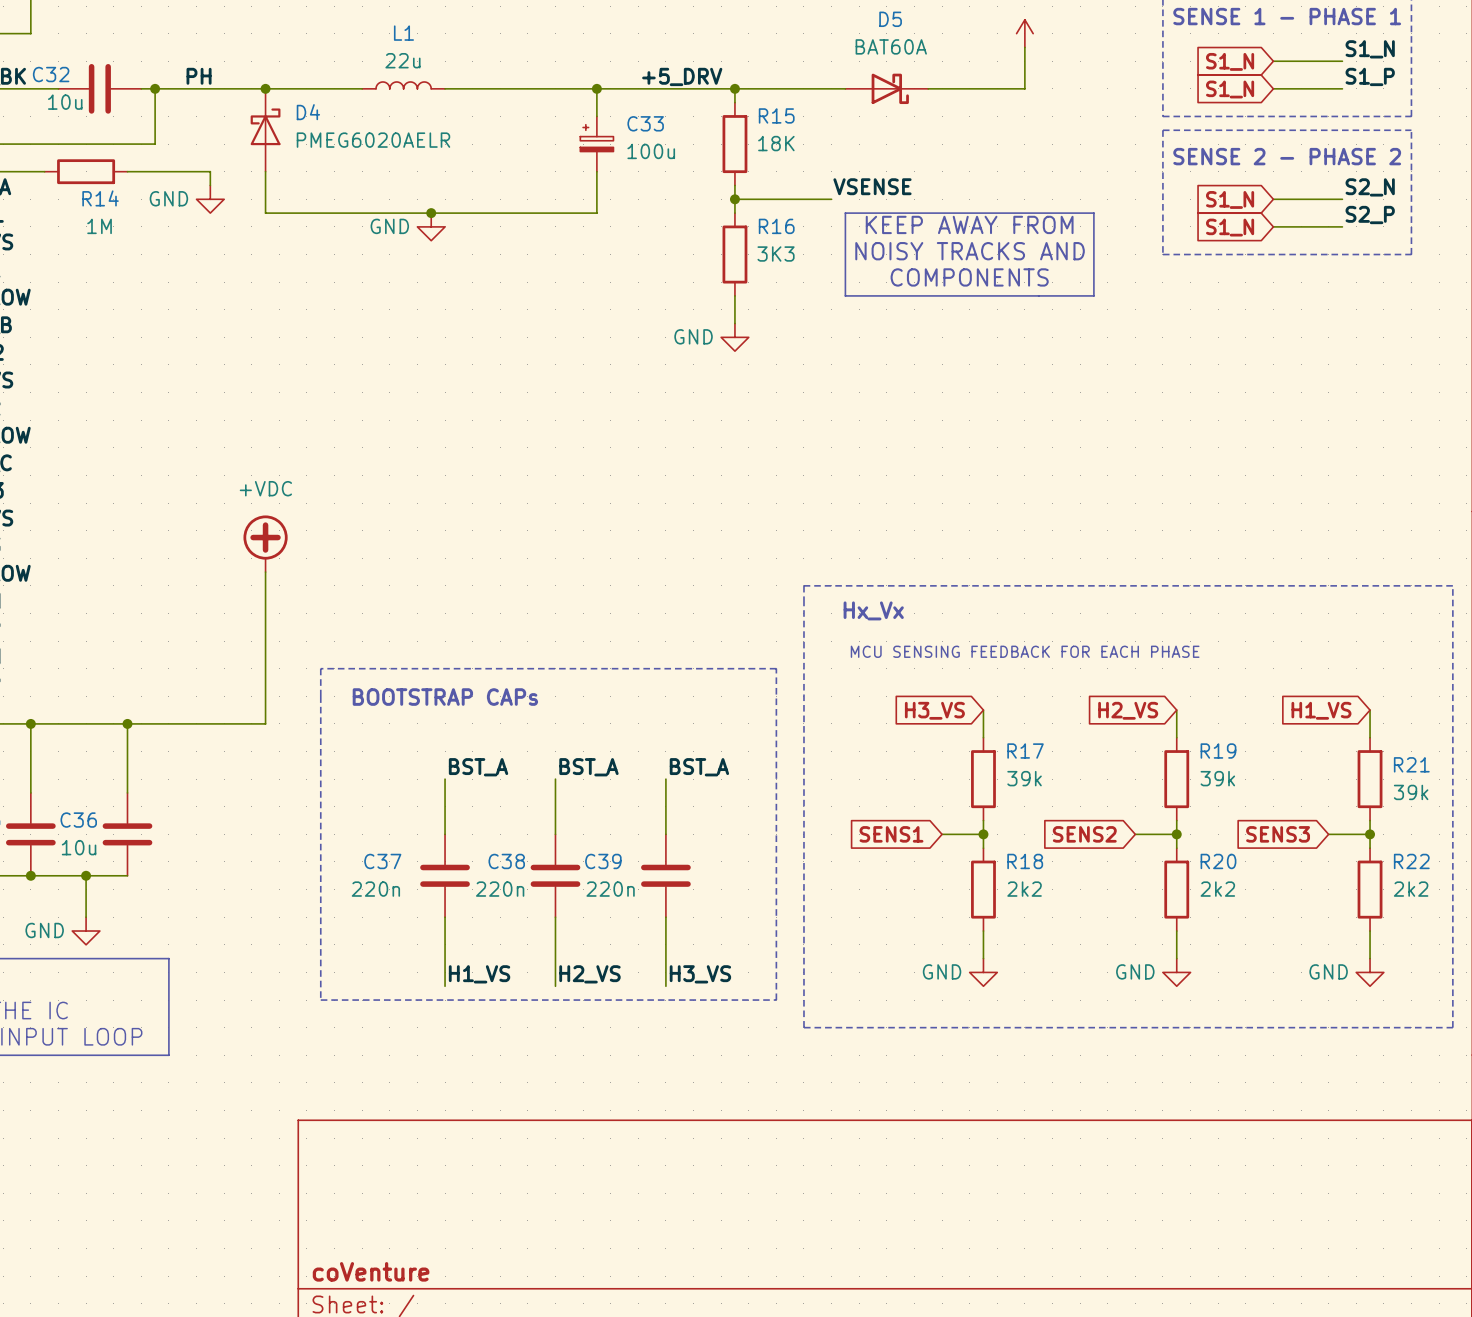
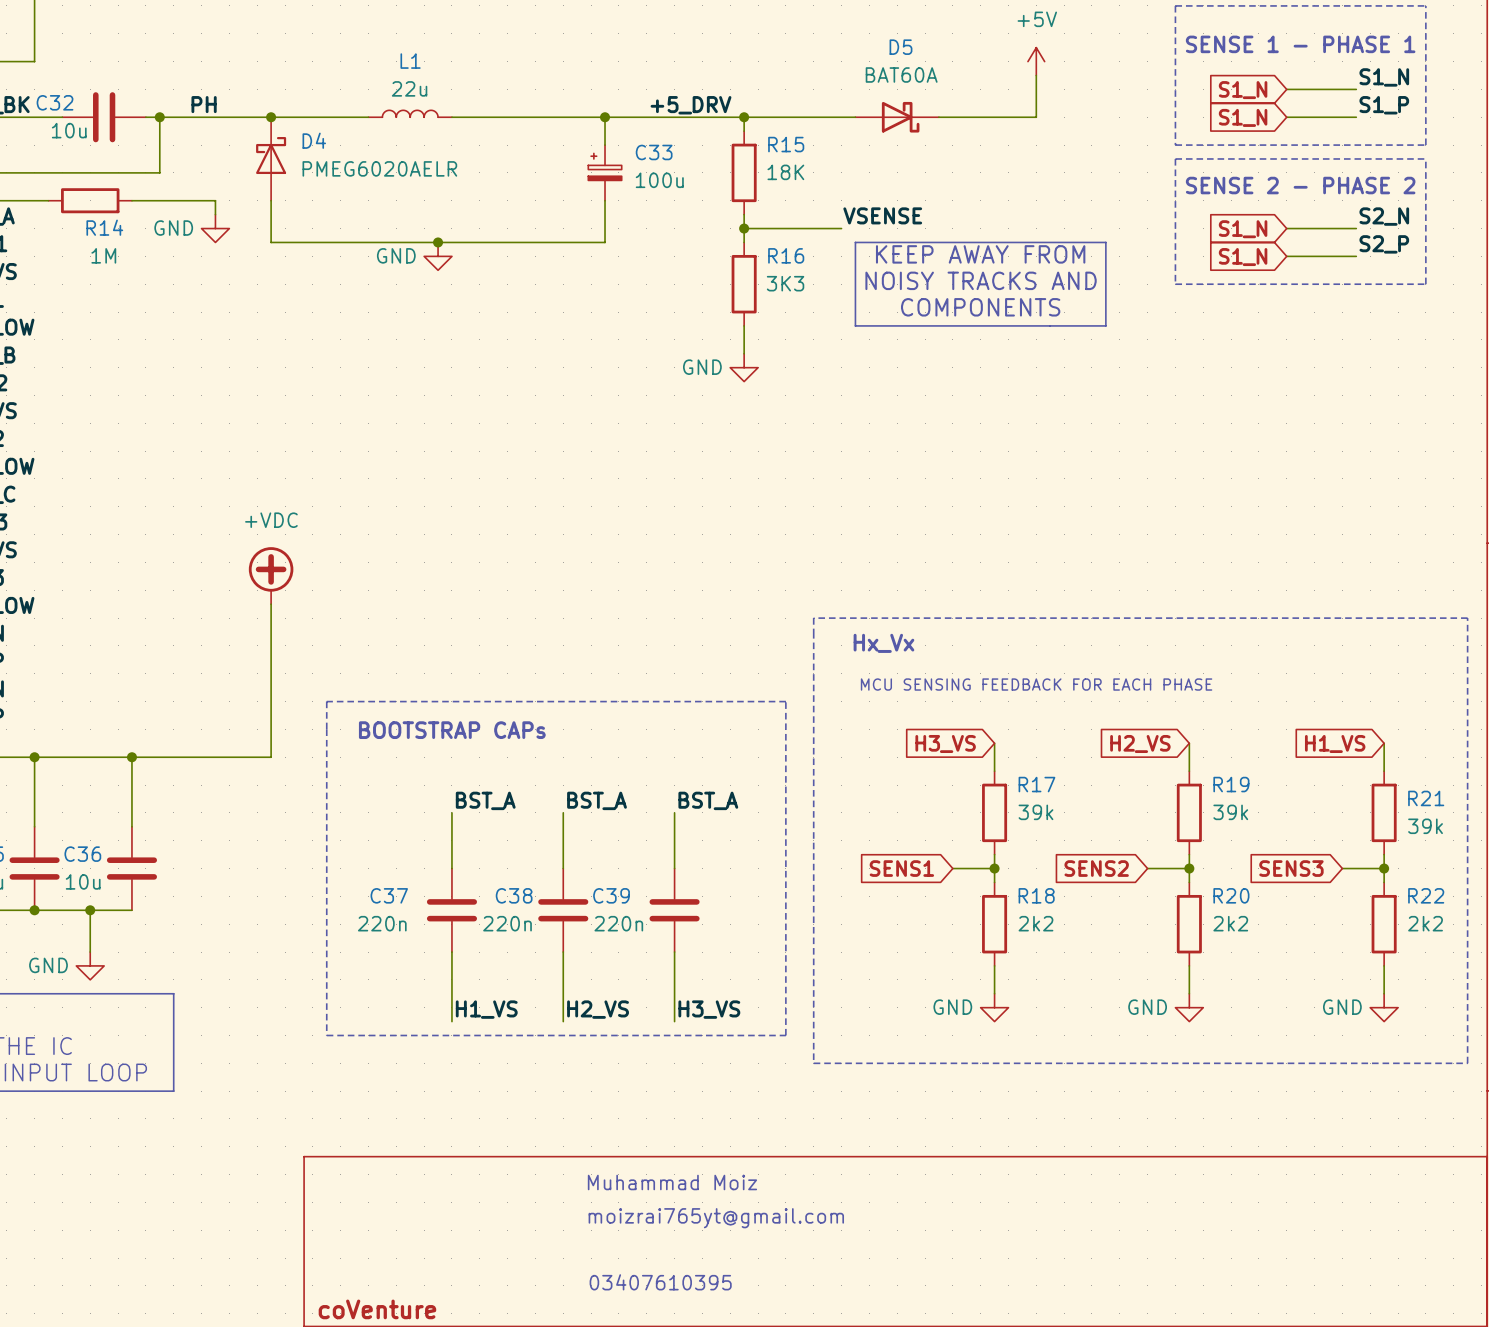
text: none -> Muhammad Moiz (672, 1182)
text: none -> moizrai765yt@gmail.com (716, 1218)
text: none -> 03407610395 (660, 1282)

